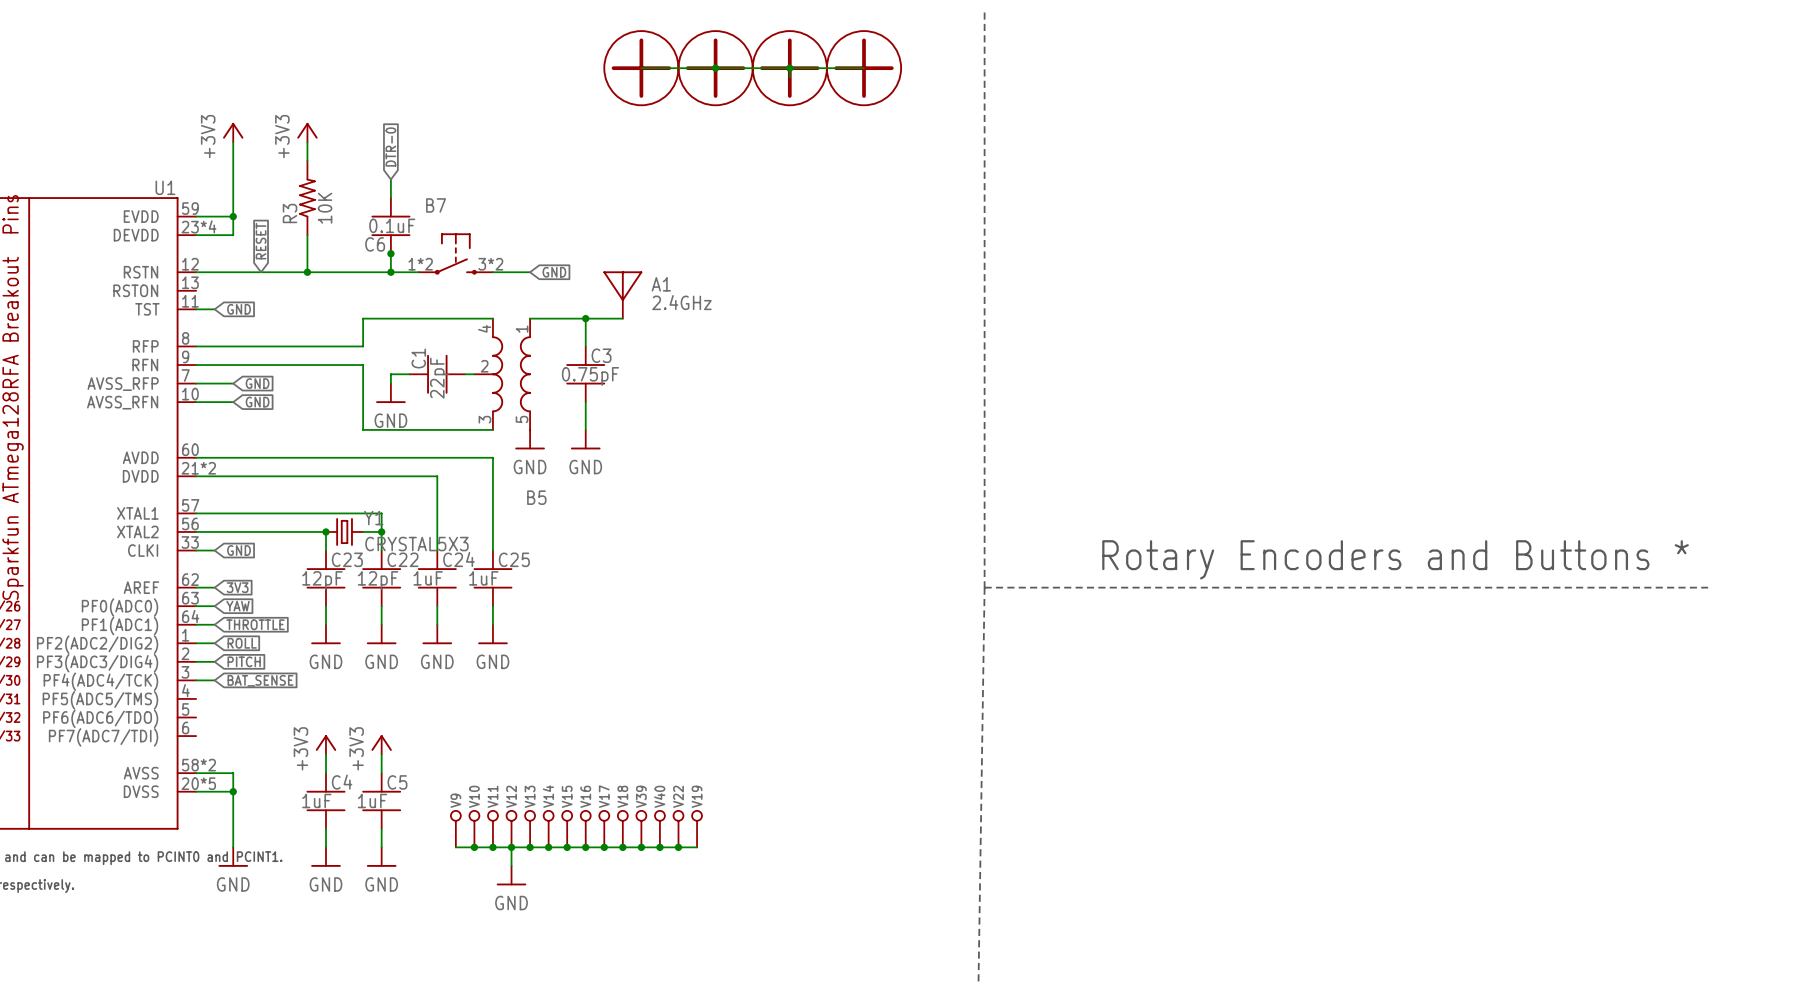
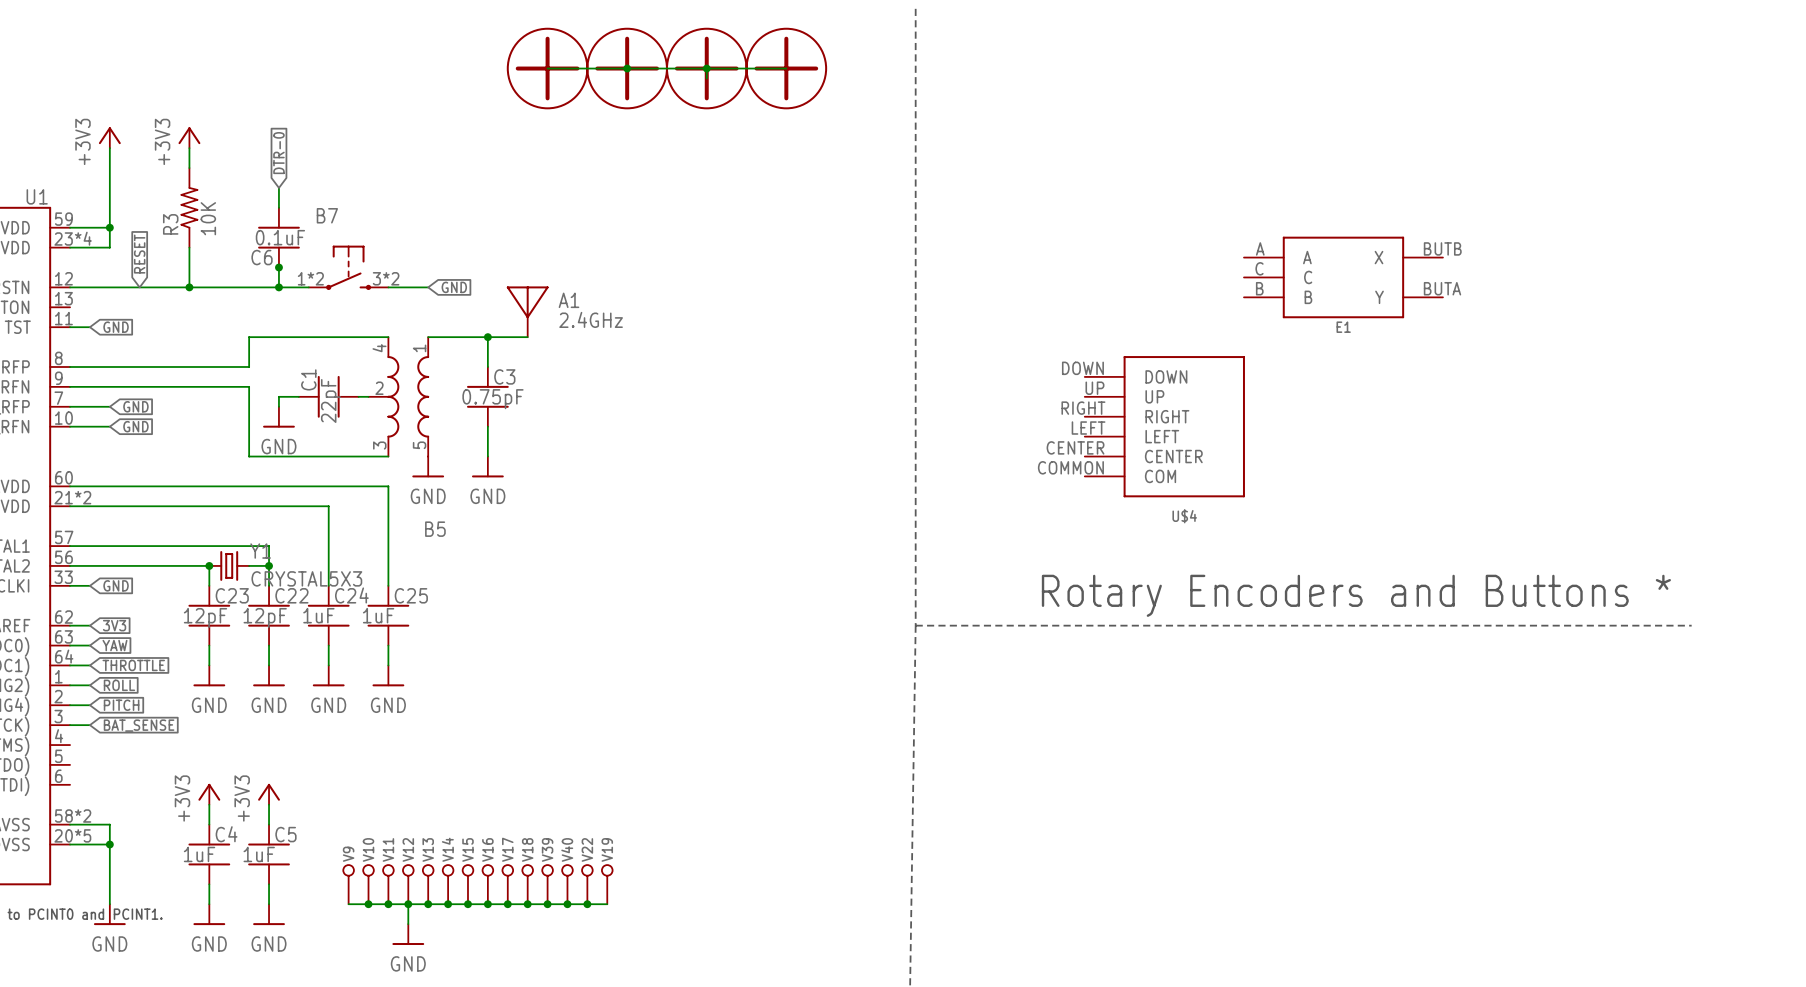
E1: none -> (1343, 277)
U$4: none -> (1164, 426)

